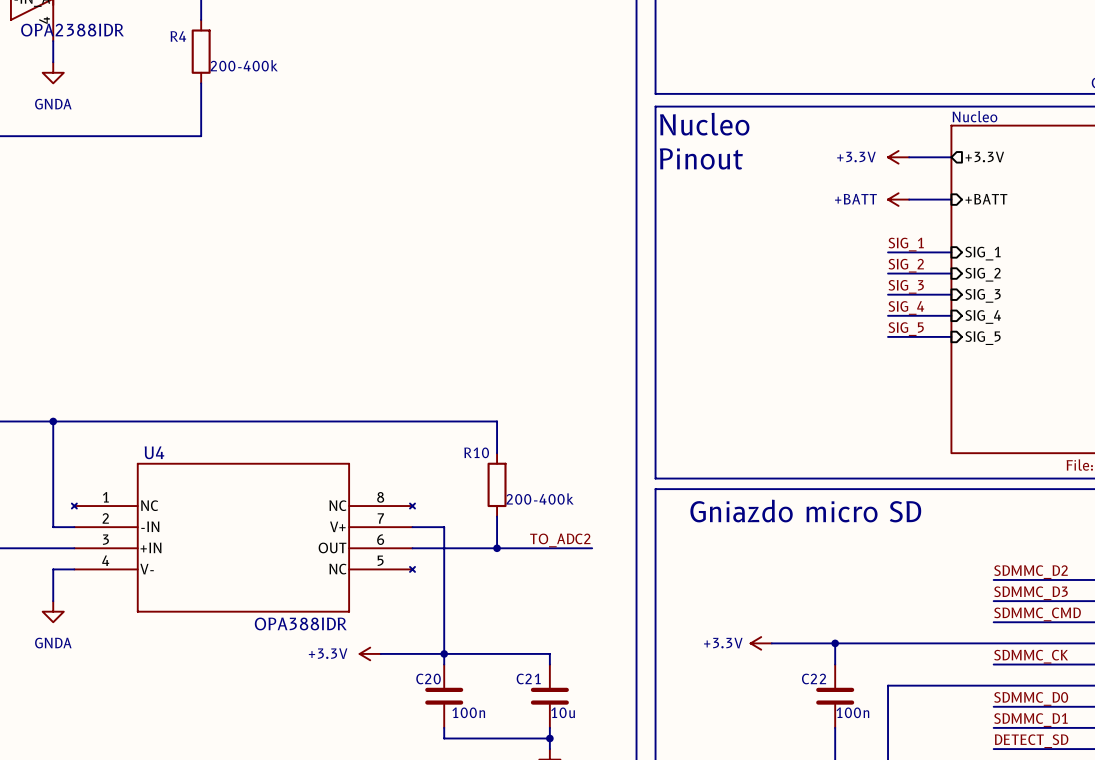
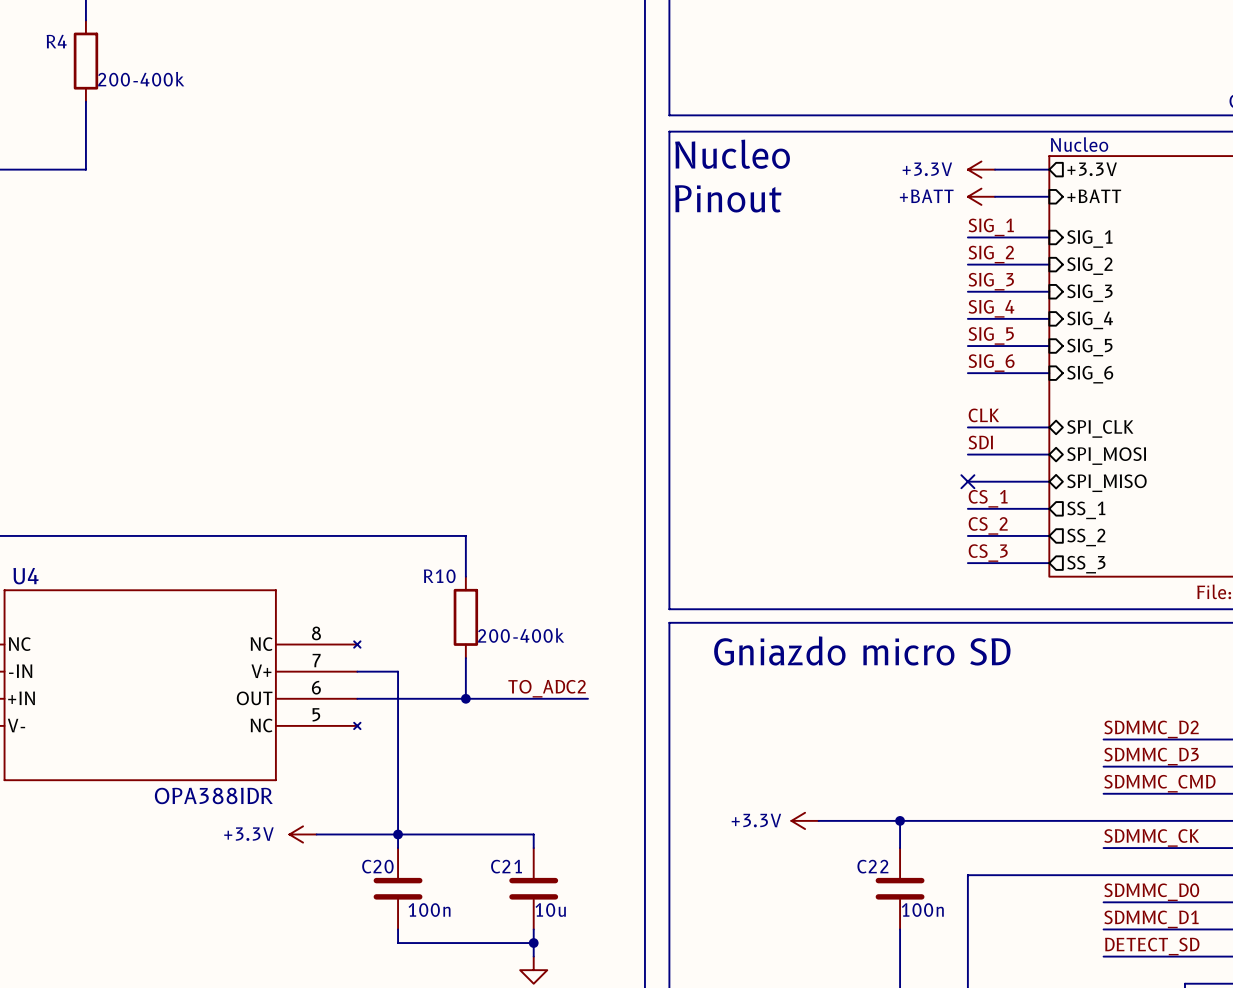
sheet pin: none -> +3.3V (1092, 169)
power symbol: none -> +3.3V (981, 169)
sheet pin shape: output (984, 156) -> input (1094, 196)
sheet pin: +3.3V (984, 156) -> +BATT (1094, 196)
power symbol: +3.3V (898, 157) -> +BATT (981, 196)
label: none -> SIG_1 (991, 227)
wire: none -> (967, 237) (1049, 237)
sheet pin: none -> SIG_1 (1089, 239)
power symbol: +BATT (898, 199) -> none
wire: (909, 199) (951, 199) -> (995, 169) (1049, 169)
sheet pin: +BATT (986, 199) -> none
label: none -> SIG_2 (991, 254)
wire: none -> (967, 264) (1049, 264)
sheet pin: none -> SIG_2 (1089, 266)
label: none -> SIG_3 (991, 281)
wire: none -> (967, 291) (1049, 291)
sheet pin: none -> SIG_3 (1089, 293)
label: SIG_1 (906, 244) -> SIG_4 (991, 308)
sheet pin: SIG_1 (983, 253) -> SIG_4 (1090, 320)
label: SIG_2 (906, 265) -> SIG_5 (991, 335)
sheet pin: SIG_2 (983, 274) -> SIG_5 (1089, 347)
label: SIG_3 (906, 286) -> SIG_6 (991, 363)
sheet pin: SIG_3 (983, 295) -> SIG_6 (1090, 374)
label: SIG_4 (906, 307) -> none
wire: (888, 315) (951, 315) -> (967, 454) (1049, 454)
sheet pin: SIG_4 (983, 317) -> none
label: SIG_5 (906, 329) -> CLK (983, 415)
sheet pin shape: input (983, 338) -> bidirectional (1100, 428)
sheet pin: SIG_5 (983, 338) -> SPI_CLK (1100, 428)
label: none -> SDI (980, 442)
sheet pin: none -> SPI_MOSI (1106, 456)
wire: none -> (967, 481) (1049, 481)
no-connect mark: none -> (967, 481)
sheet pin: none -> SPI_MISO (1106, 483)
label: none -> CS_1 (988, 498)
wire: none -> (967, 508) (1049, 508)
sheet pin: none -> SS_1 (1086, 510)
label: none -> CS_2 (988, 525)
wire: none -> (967, 535) (1049, 535)
sheet pin: none -> SS_2 (1086, 537)
label: none -> CS_3 (988, 553)
wire: none -> (967, 563) (1049, 563)
sheet pin: none -> SS_3 (1086, 564)

